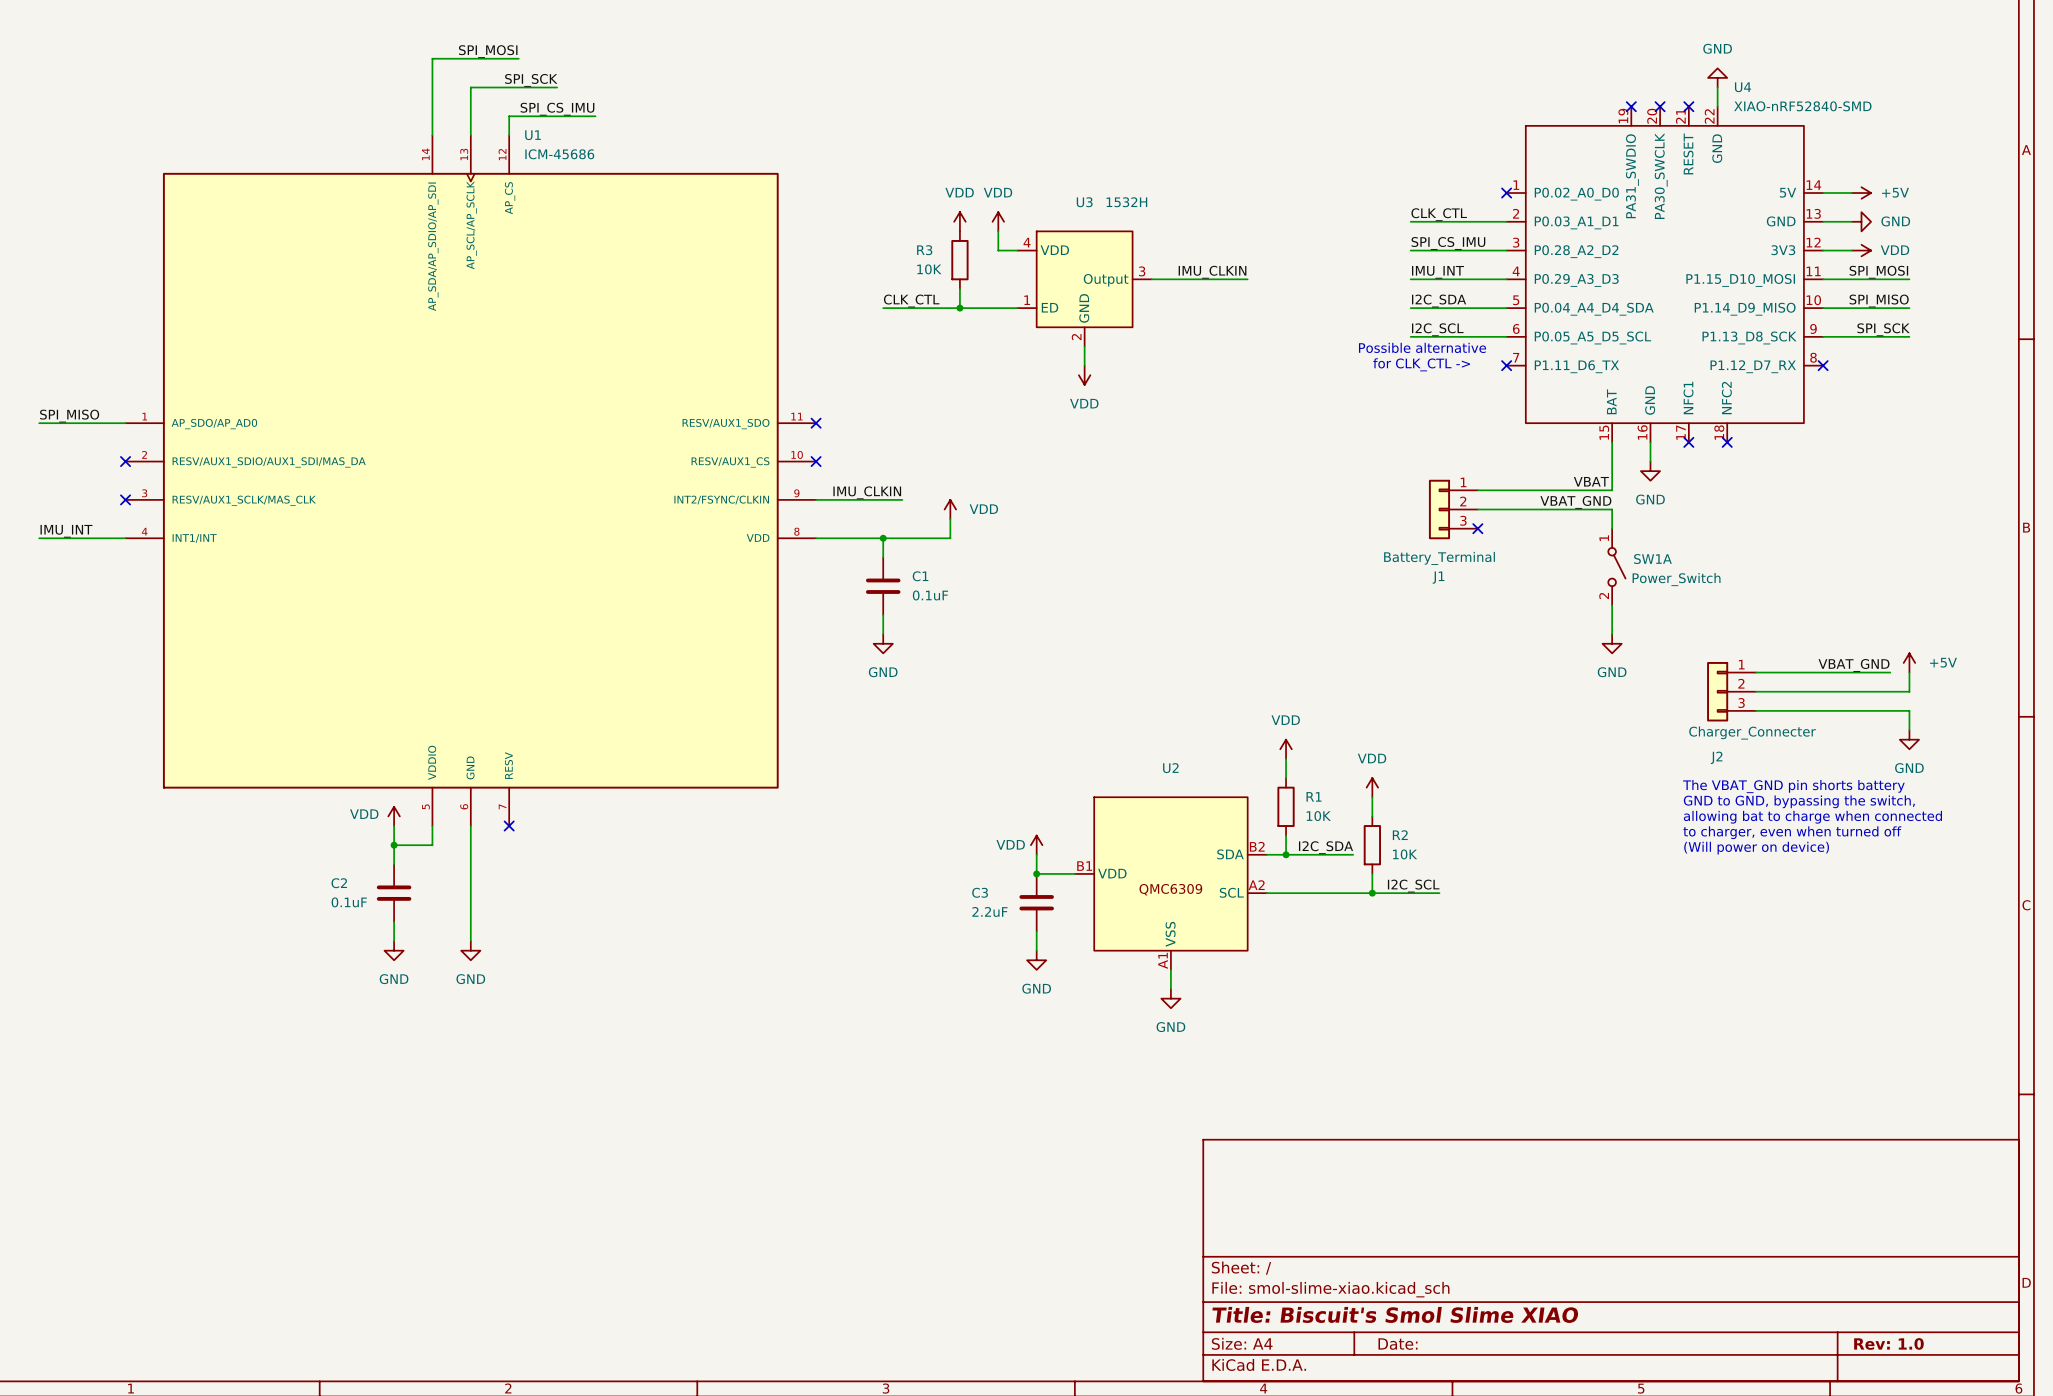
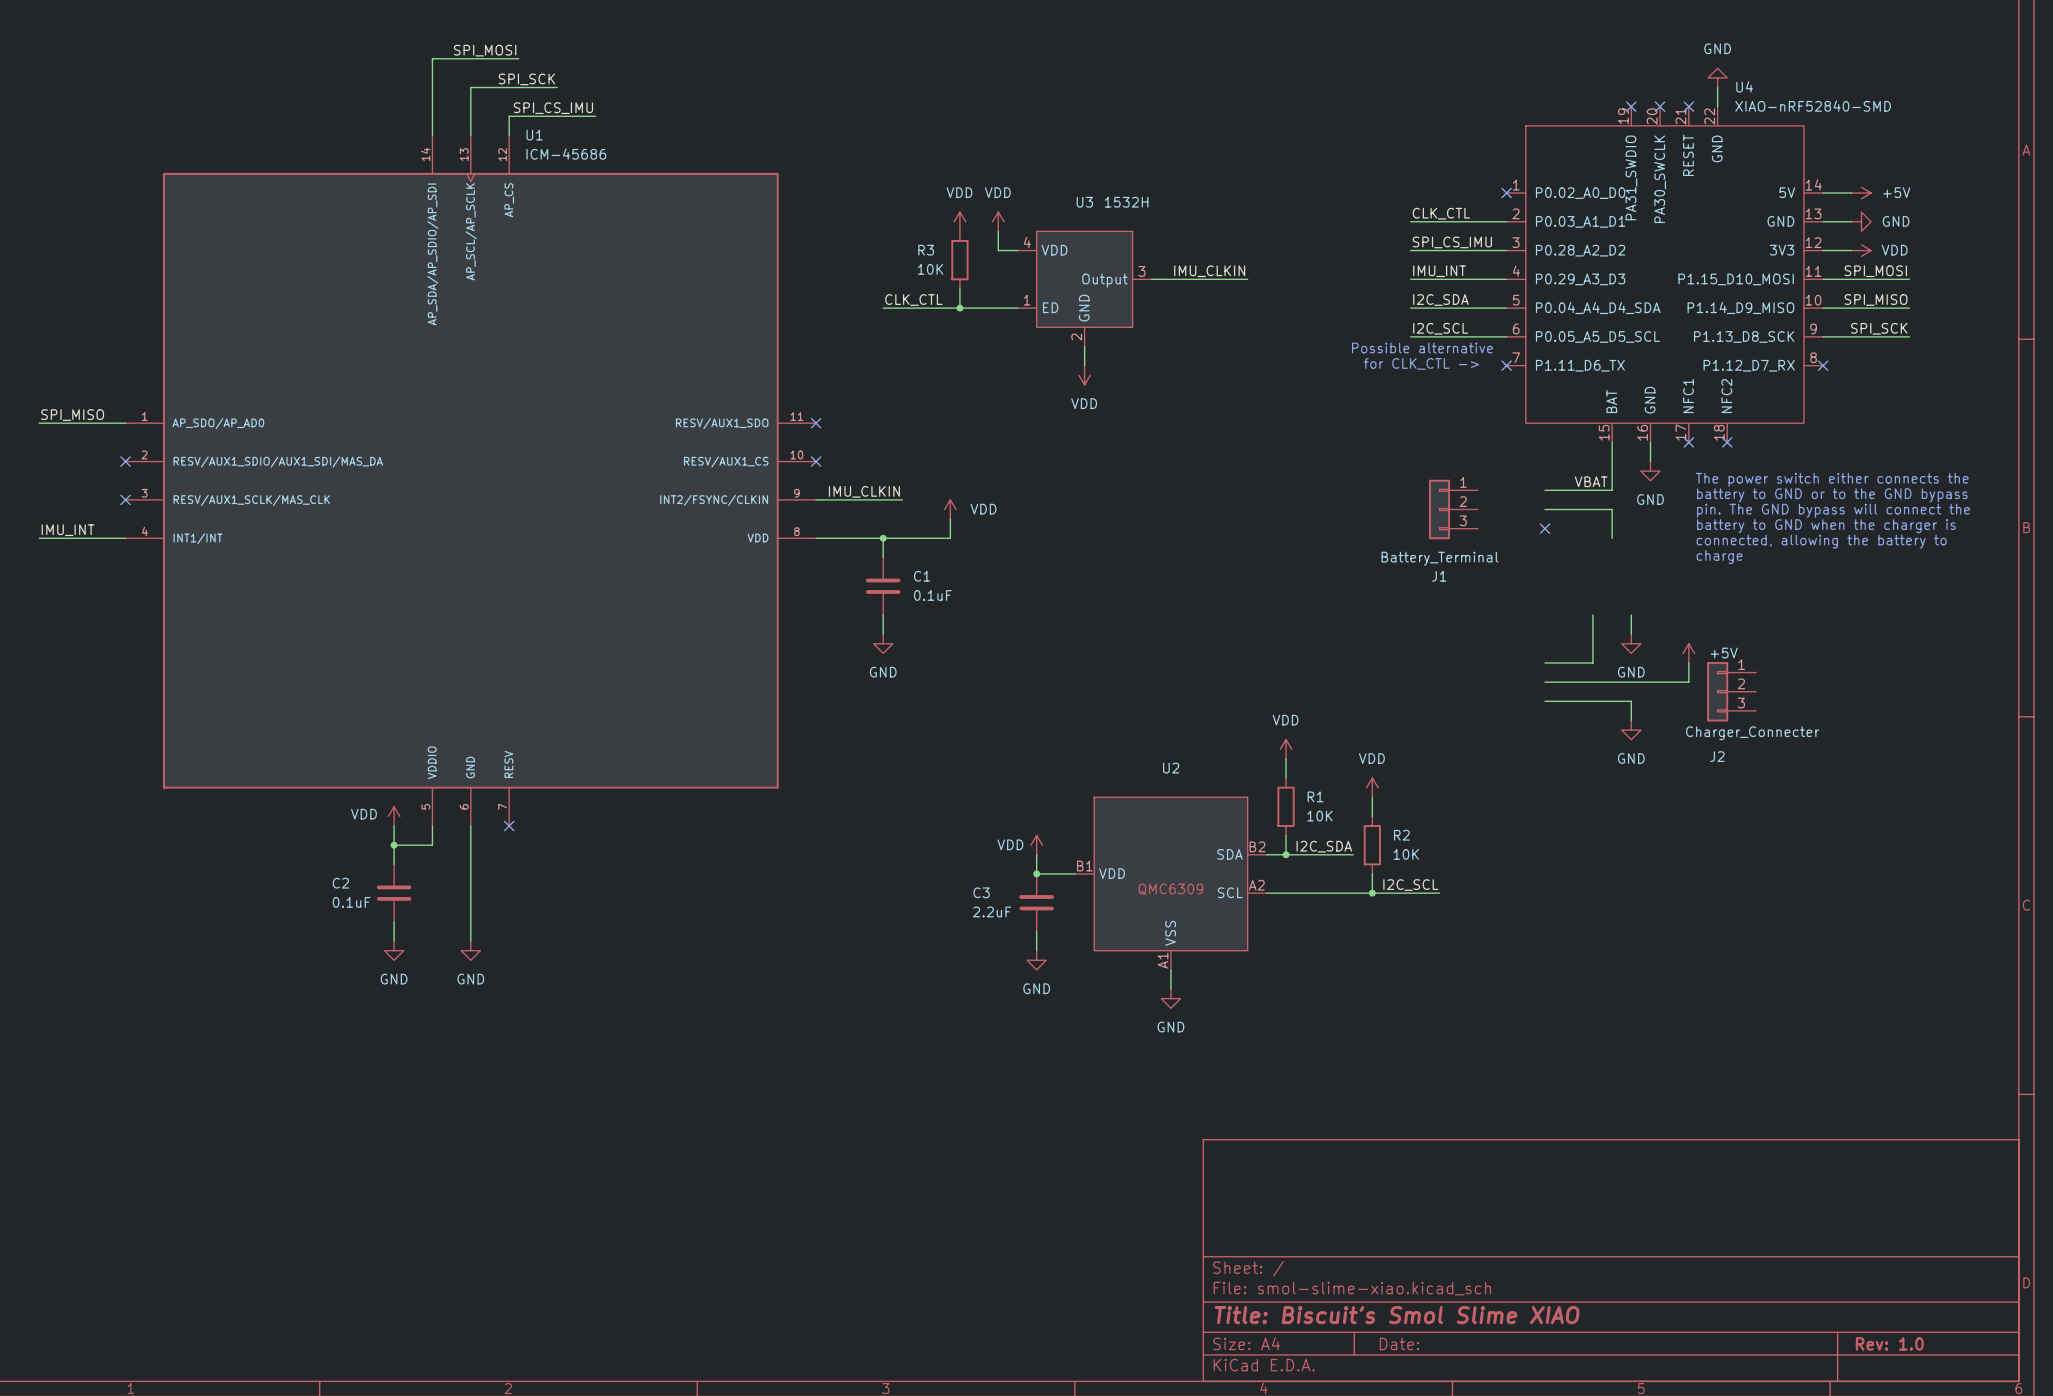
text: none -> The power switch either connects the (1832, 479)
wire: (1477, 490) (1544, 490) -> none
text: none -> battery to GND or to the GND bypass (1832, 495)
label: VBAT_GND (1575, 502) -> none
wire: (1477, 509) (1544, 509) -> none
text: none -> pin. The GND bypass will connect the (1833, 510)
text: none -> battery to GND when the charger is (1826, 526)
no-connect mark: (1477, 528) -> none
no-connect mark: none -> (1544, 528)
text: none -> connected, allowing the battery to (1821, 541)
text: none -> charge (1719, 557)
SW1A: Power_Switch (1616, 567) -> none
wire: (1612, 605) (1612, 634) -> none
wire: none -> (1592, 615) (1592, 662) (1544, 662)
wire: none -> (1631, 615) (1631, 634)
power symbol position: GND (1612, 643) -> GND (1631, 643)
power symbol: none -> +5V (1688, 653)
wire: none -> (1688, 662) (1688, 682) (1544, 682)
power symbol: +5V (1909, 662) -> none
label: VBAT_GND (1854, 665) -> none
wire: (1755, 672) (1890, 672) -> none
wire: (1909, 672) (1909, 691) (1755, 691) -> none
wire: none -> (1544, 701) (1631, 701) (1631, 720)
wire: (1755, 710) (1909, 710) (1909, 730) -> none
power symbol: none -> GND (1631, 730)
power symbol: GND (1909, 739) -> none
text: The VBAT_GND pin shorts battery (1793, 786) -> none
text: GND to GND, bypassing the switch, (1799, 801) -> none
text: allowing bat to charge when connected (1812, 817) -> none
text: to charger, even when turned off (1792, 832) -> none
text: (Will power on device) (1756, 848) -> none

